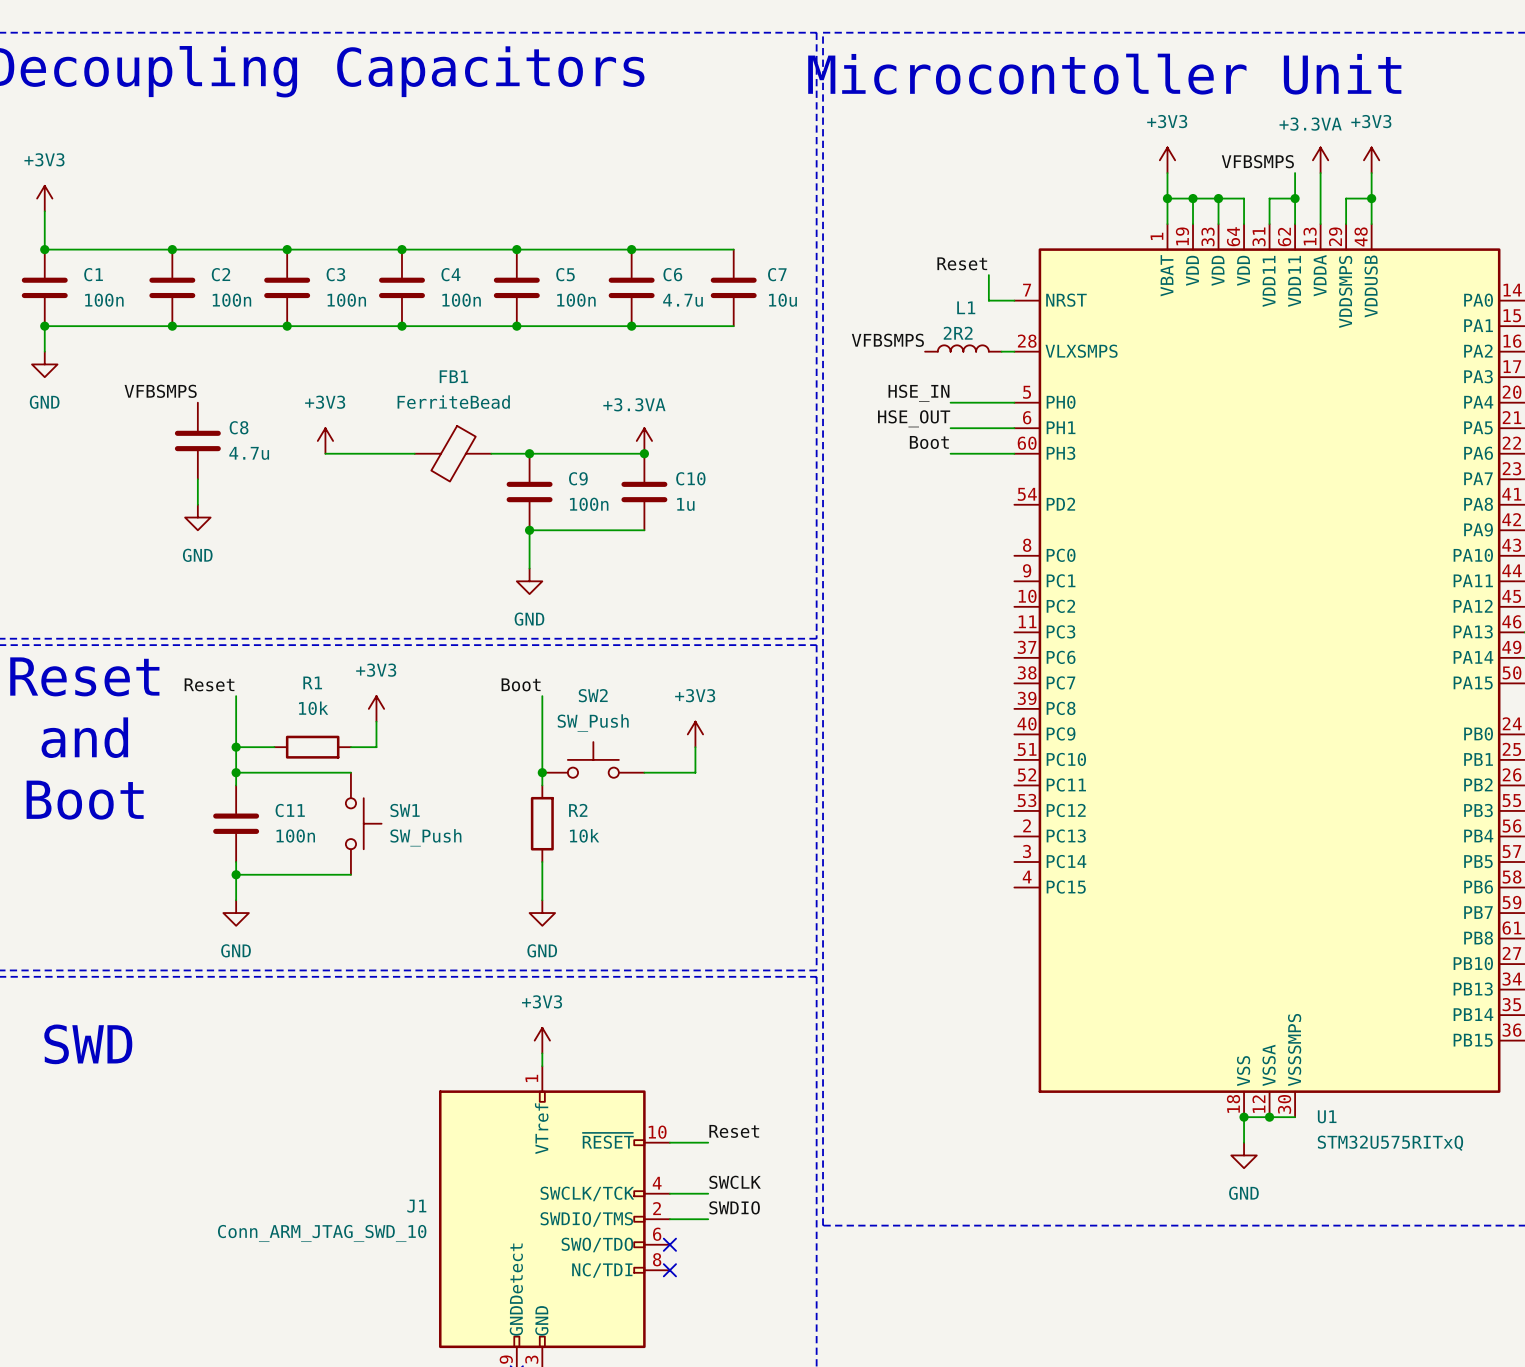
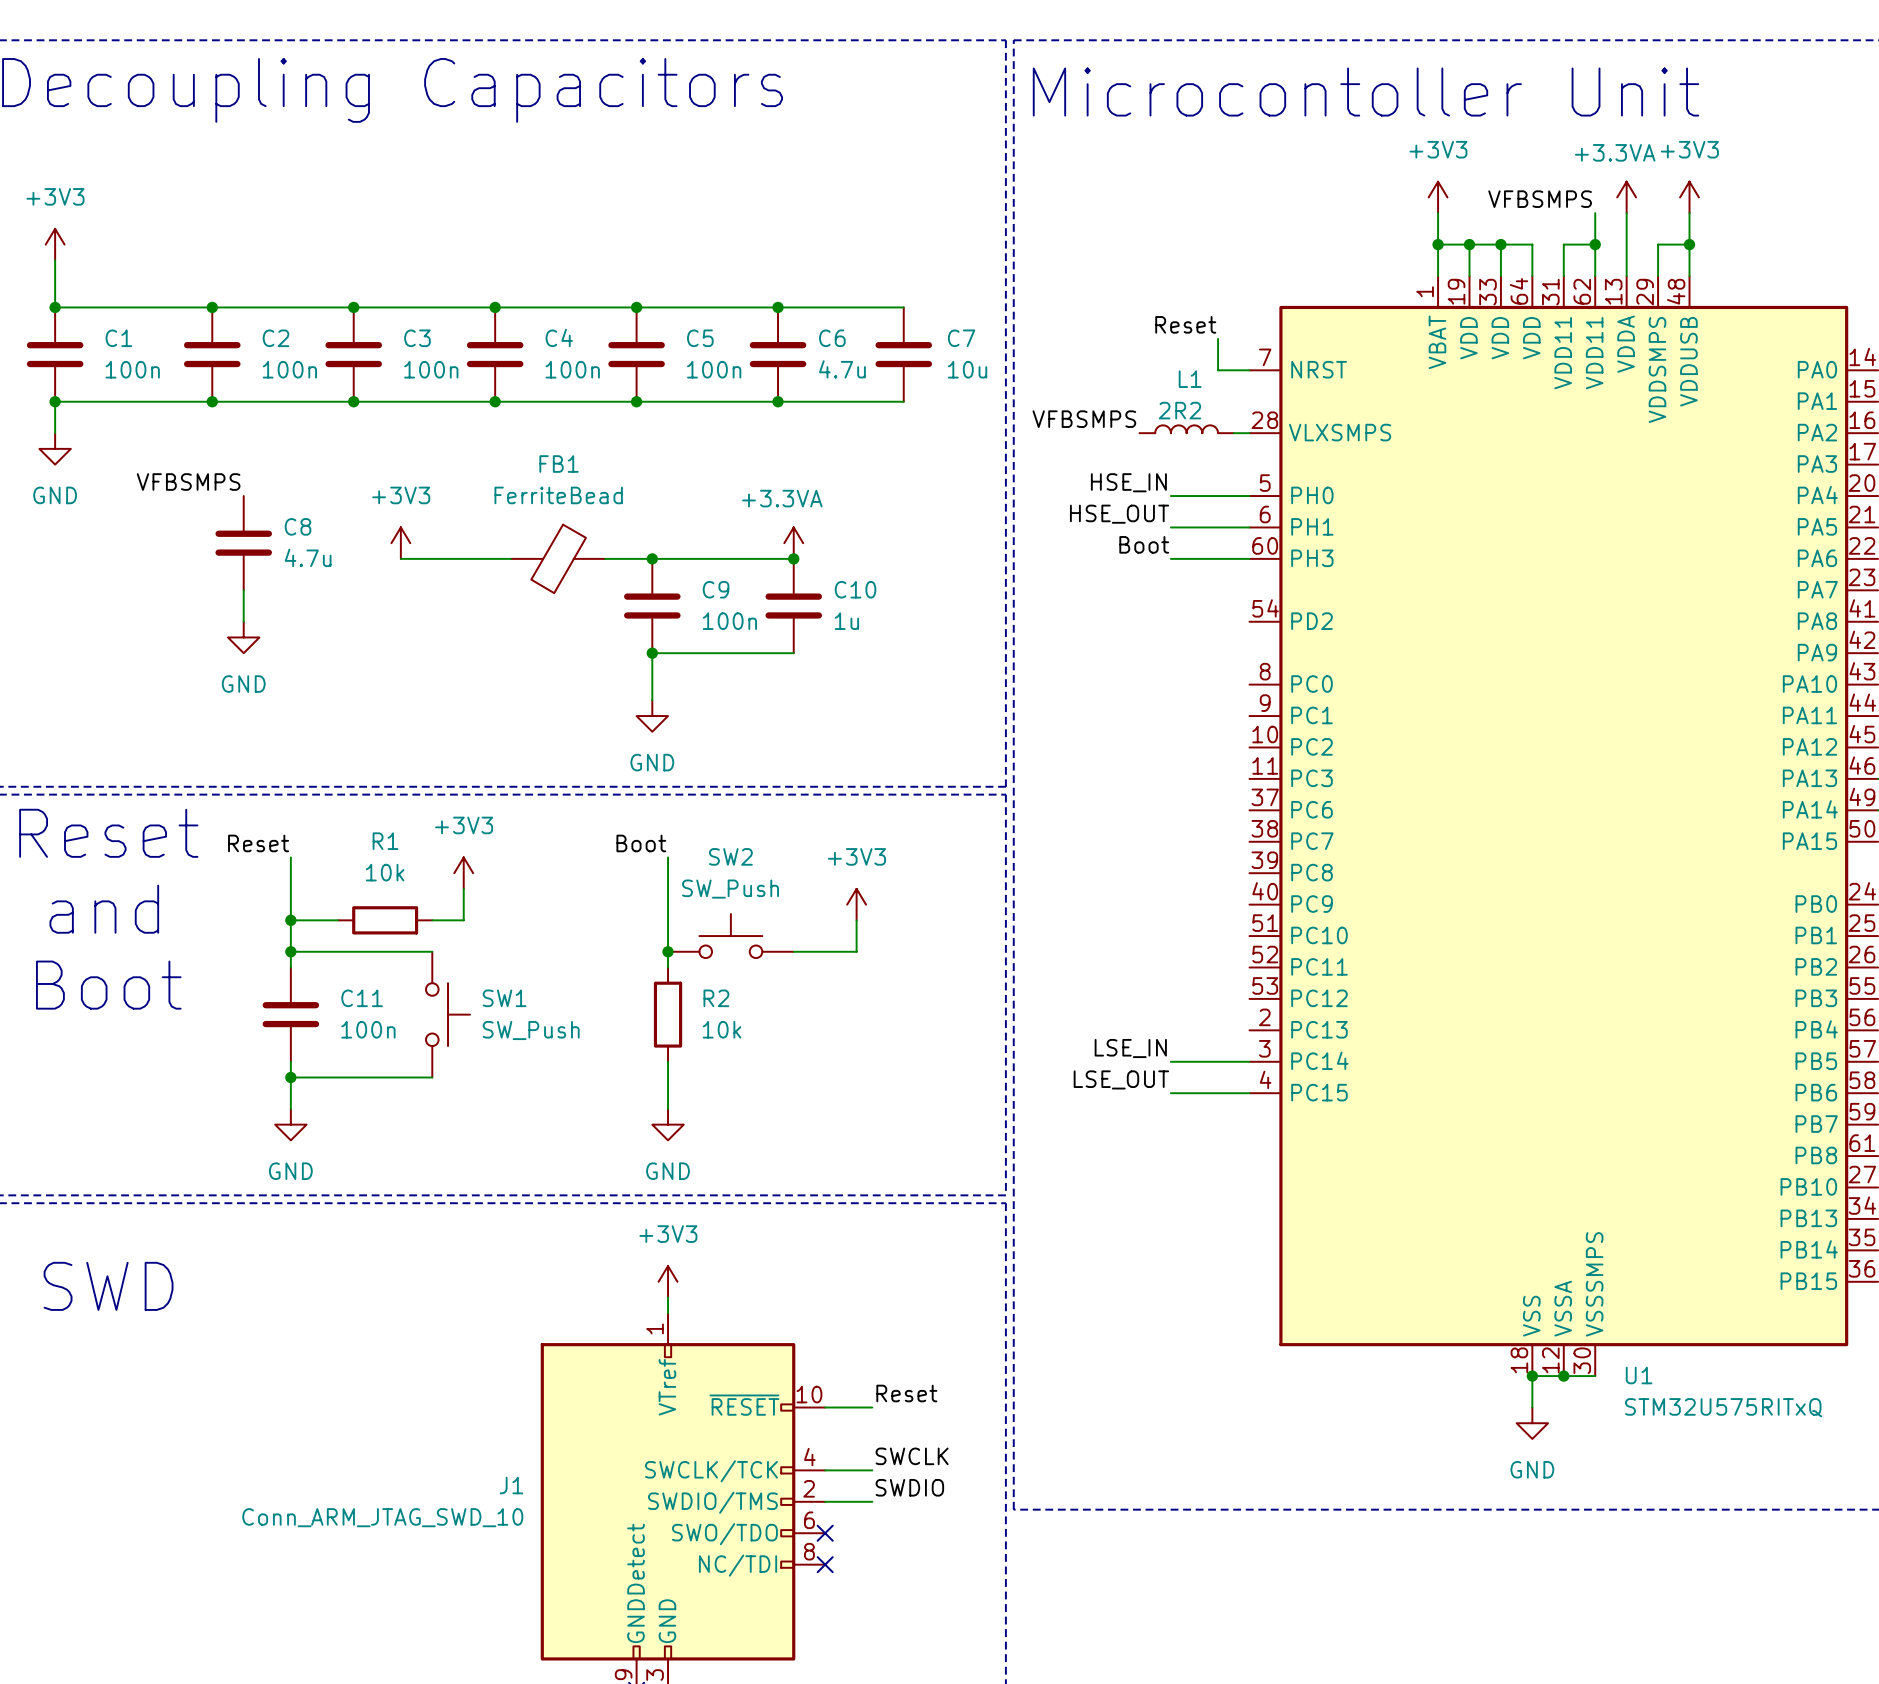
label: none -> LSE_IN (1130, 1048)
wire: none -> (1170, 1061) (1249, 1061)
label: none -> LSE_OUT (1121, 1079)
wire: none -> (1170, 1093) (1249, 1093)

